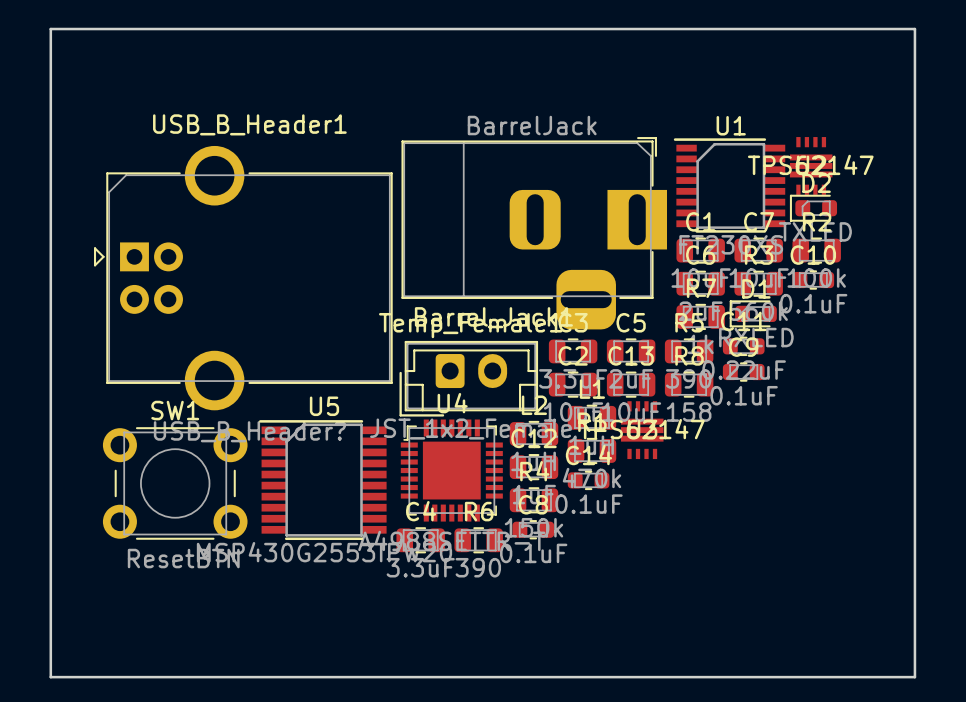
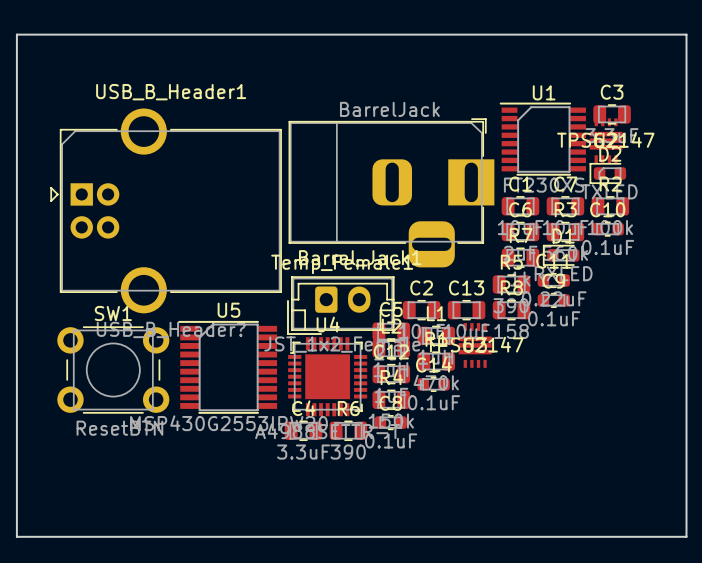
U1 position: (729, 185) -> (542, 139)
USB_B_Header1 position: (243, 278) -> (166, 210)
C3 position: (573, 351) -> (612, 114)
C5 position: (631, 351) -> (391, 331)
U5 position: (322, 480) -> (227, 367)
SW1 position: (175, 483) -> (113, 370)

